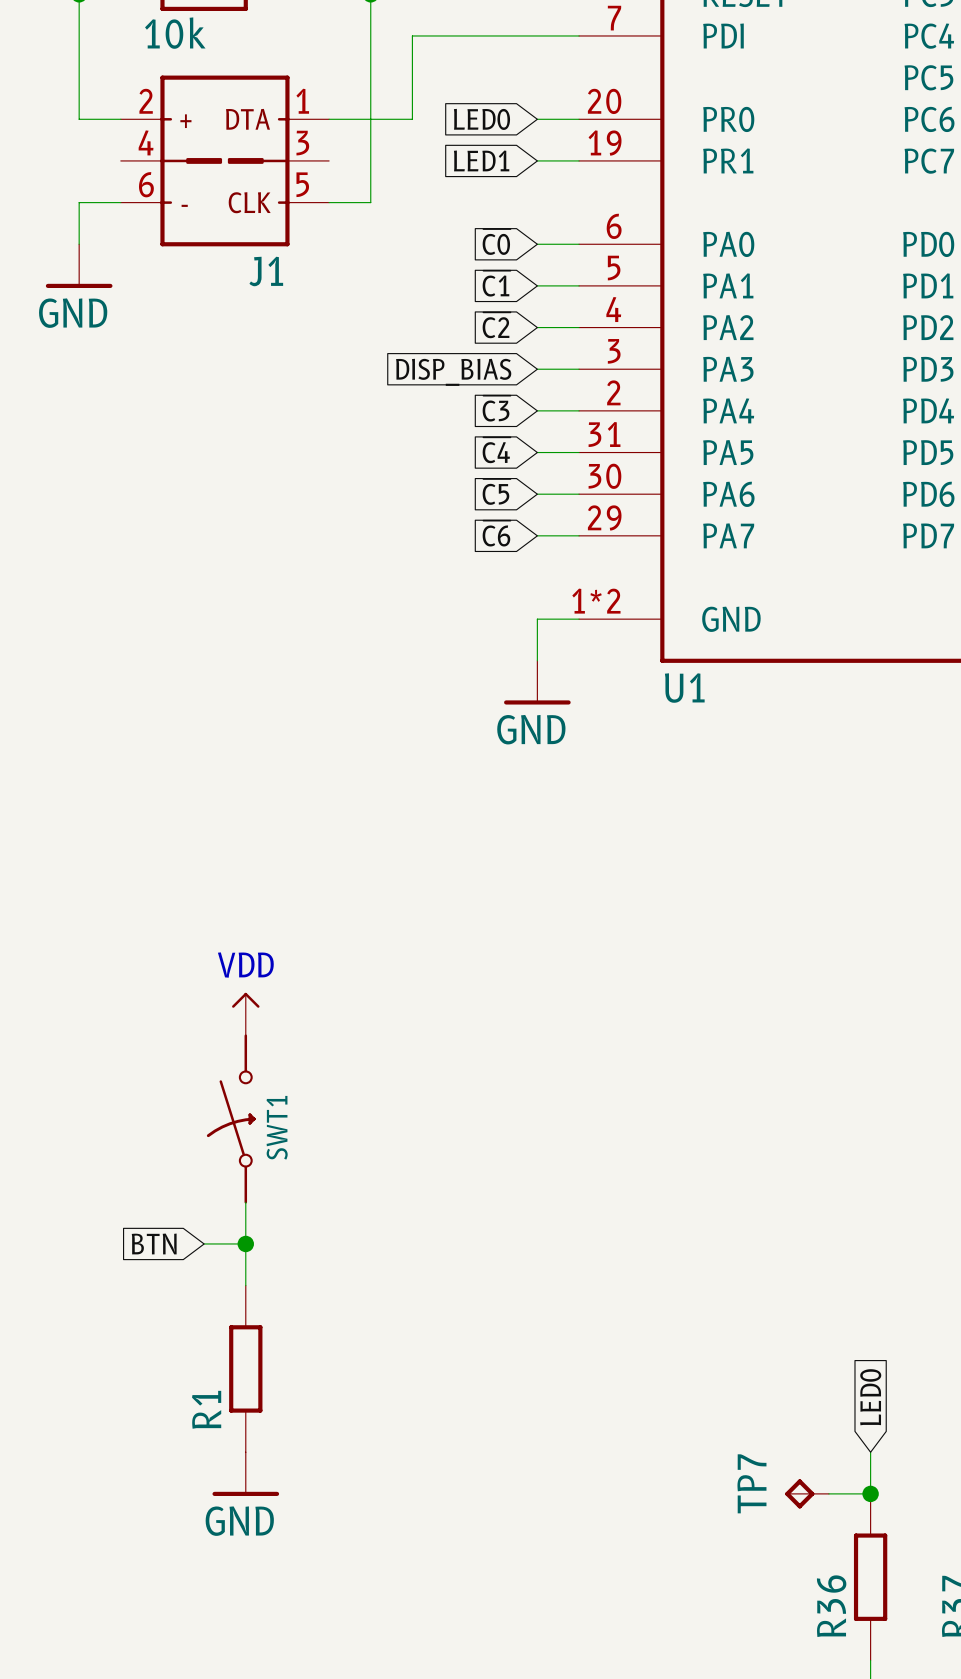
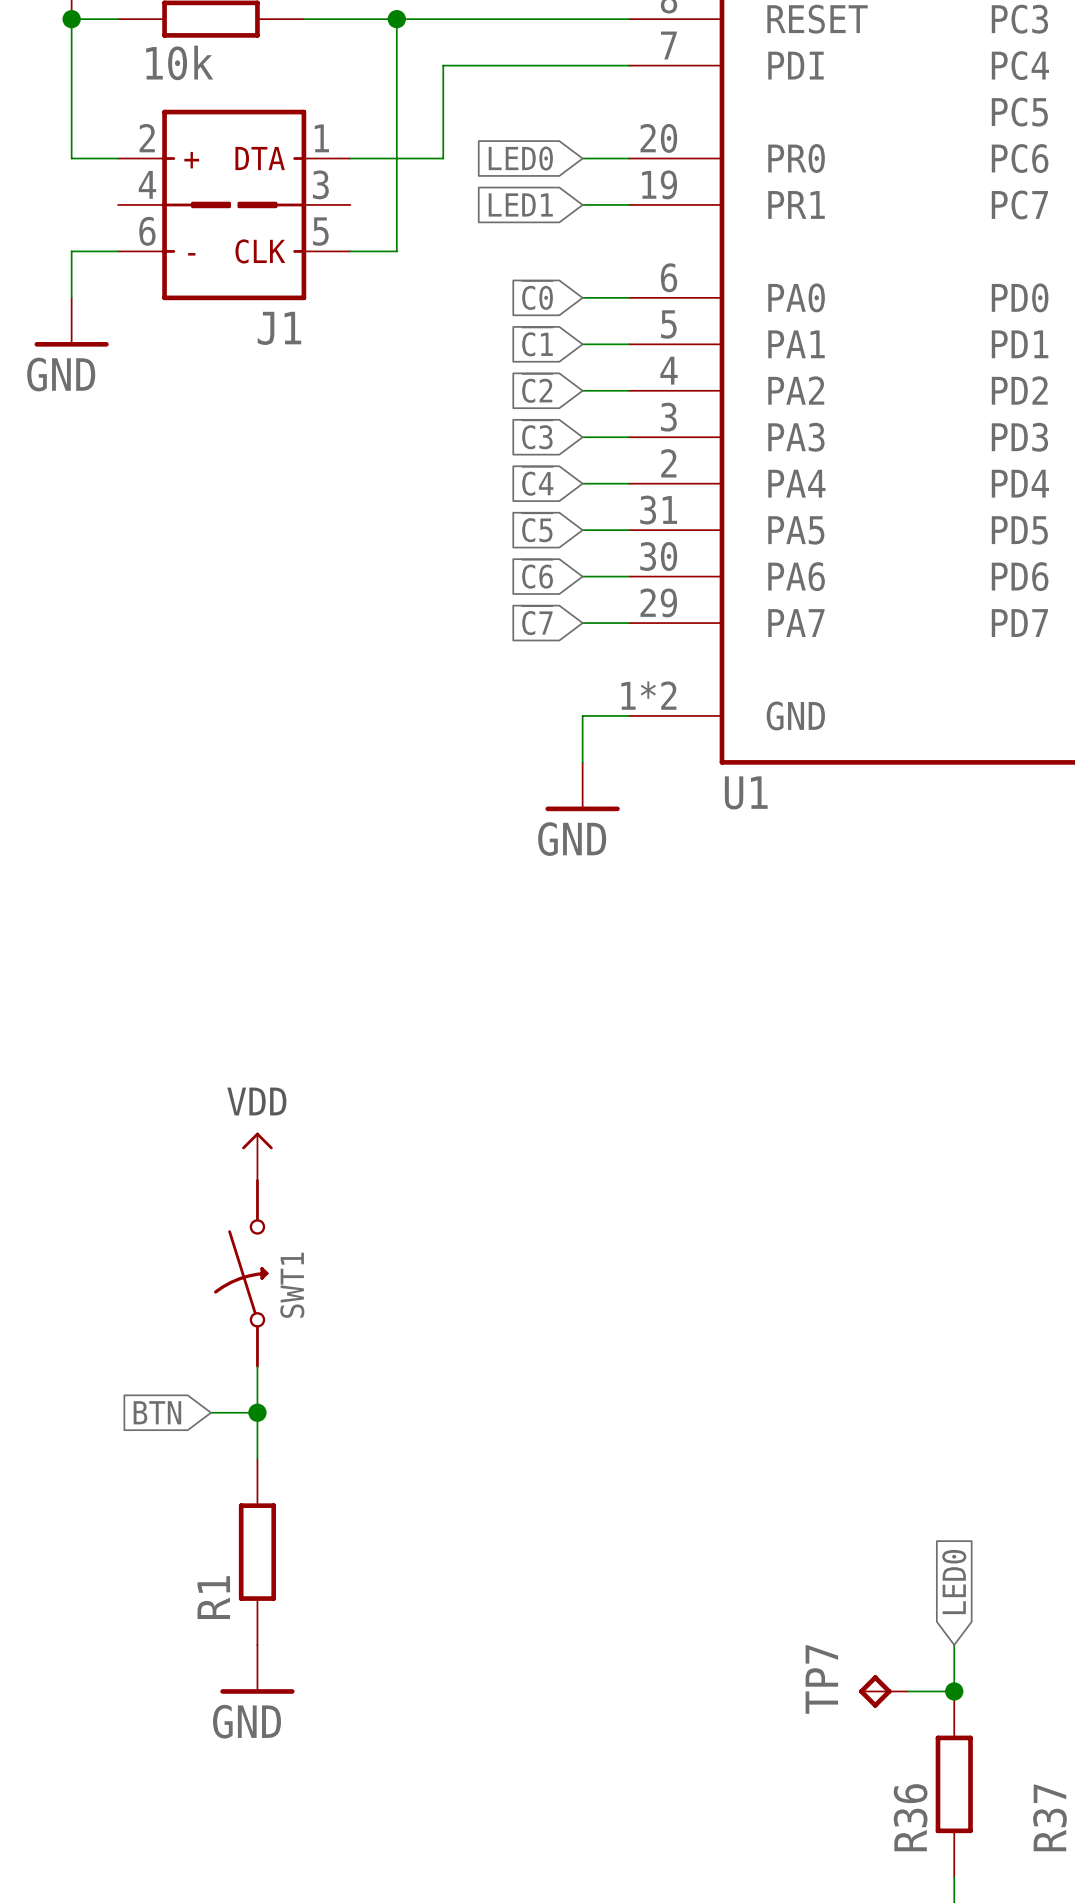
global label: DISP_BIAS (453, 372) -> ~{C3} (537, 434)
global label: ~{C3} (496, 408) -> ~{C4} (537, 481)
global label: ~{C4} (496, 450) -> ~{C5} (537, 527)
global label: ~{C5} (496, 491) -> ~{C6} (537, 574)
global label: ~{C6} (496, 533) -> ~{C7} (537, 620)

